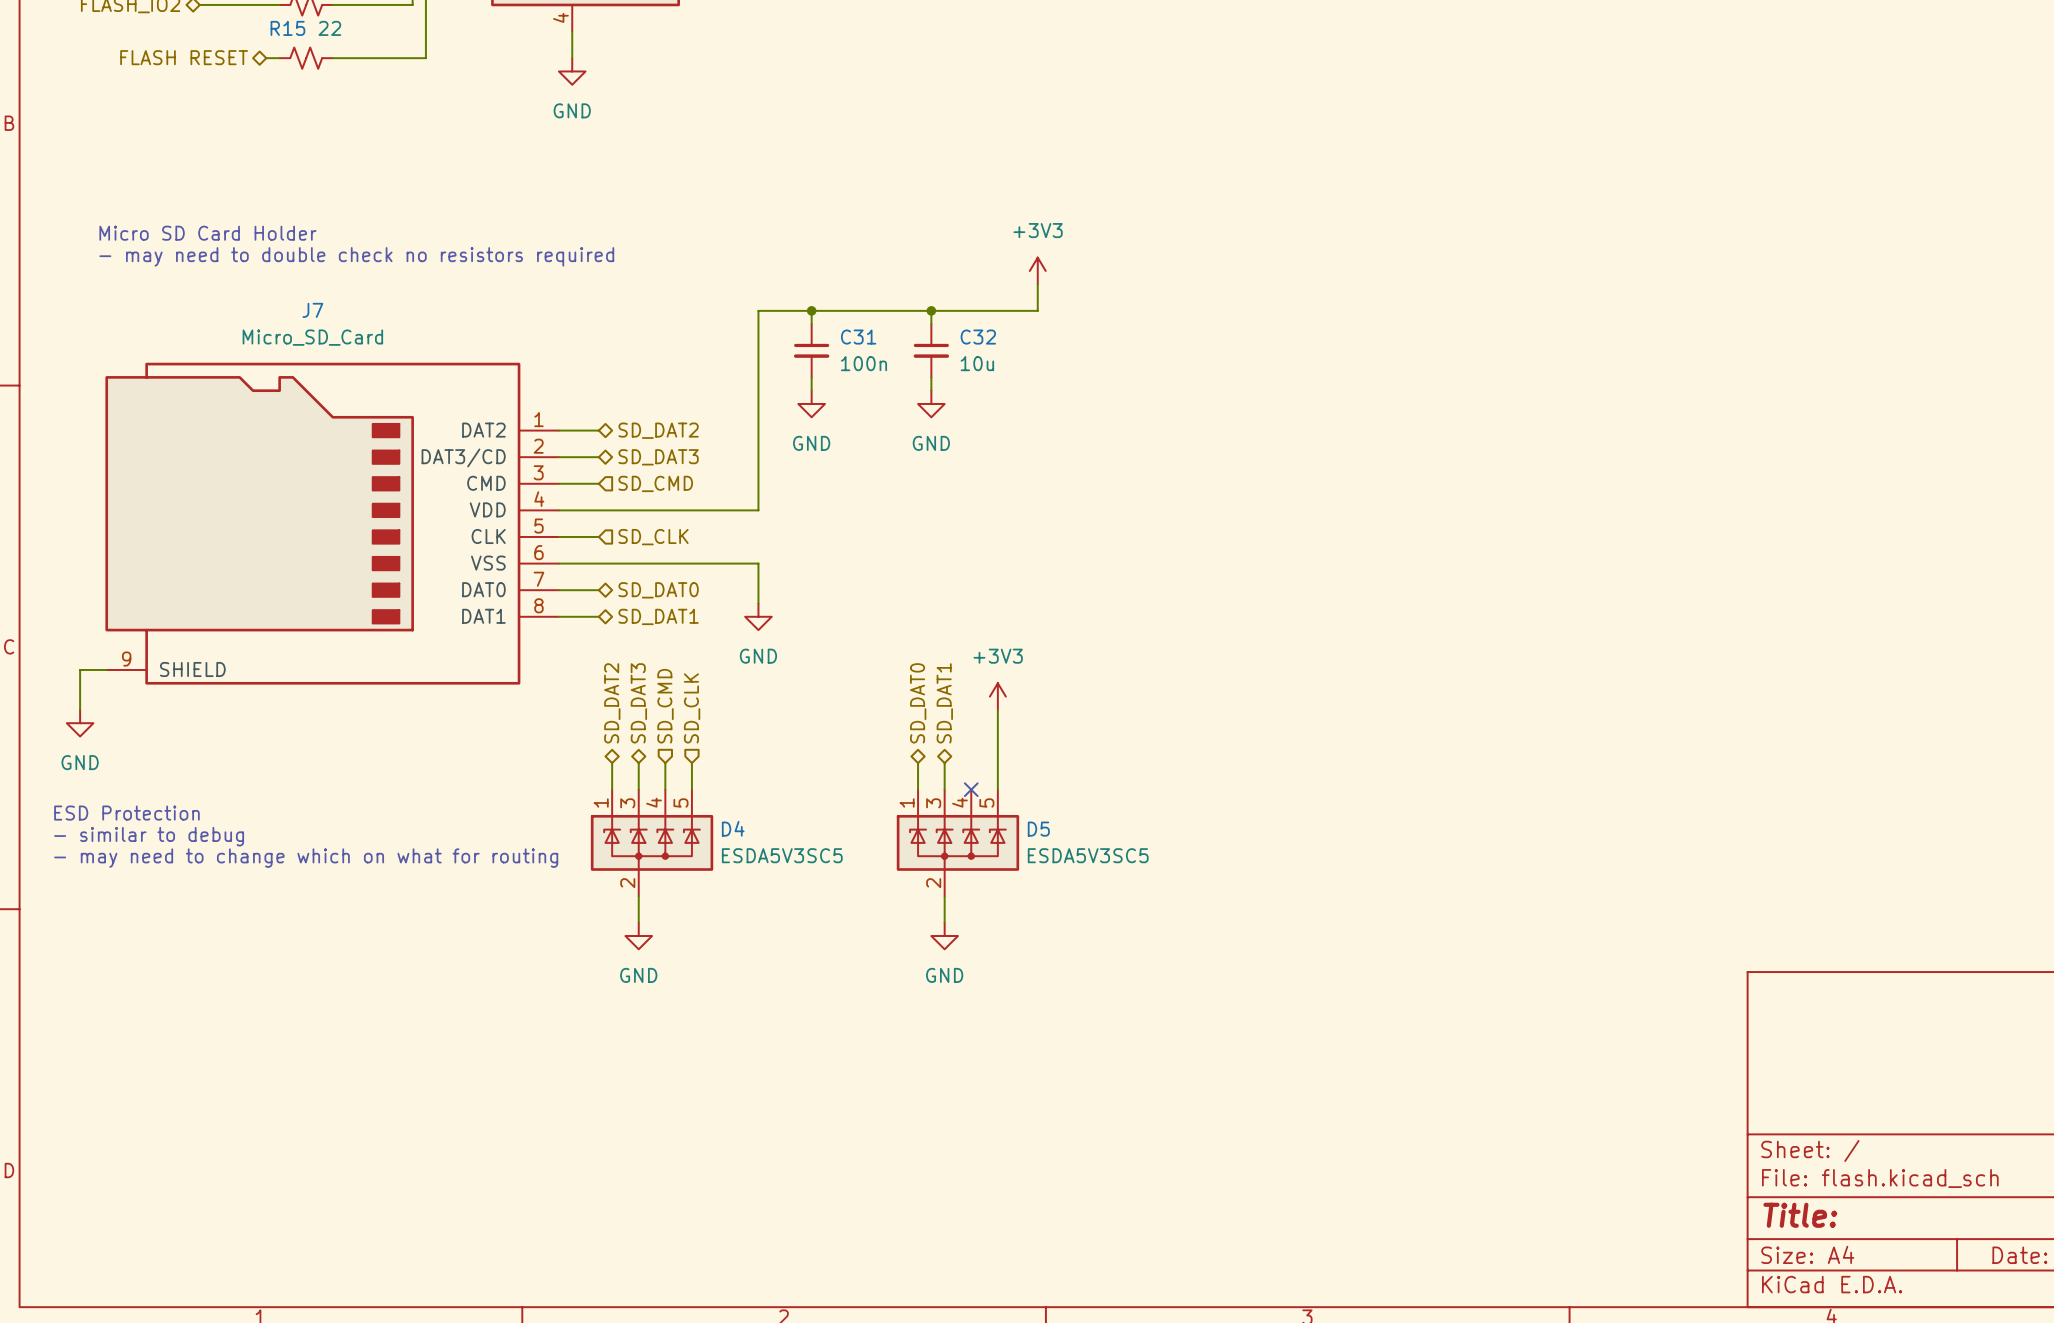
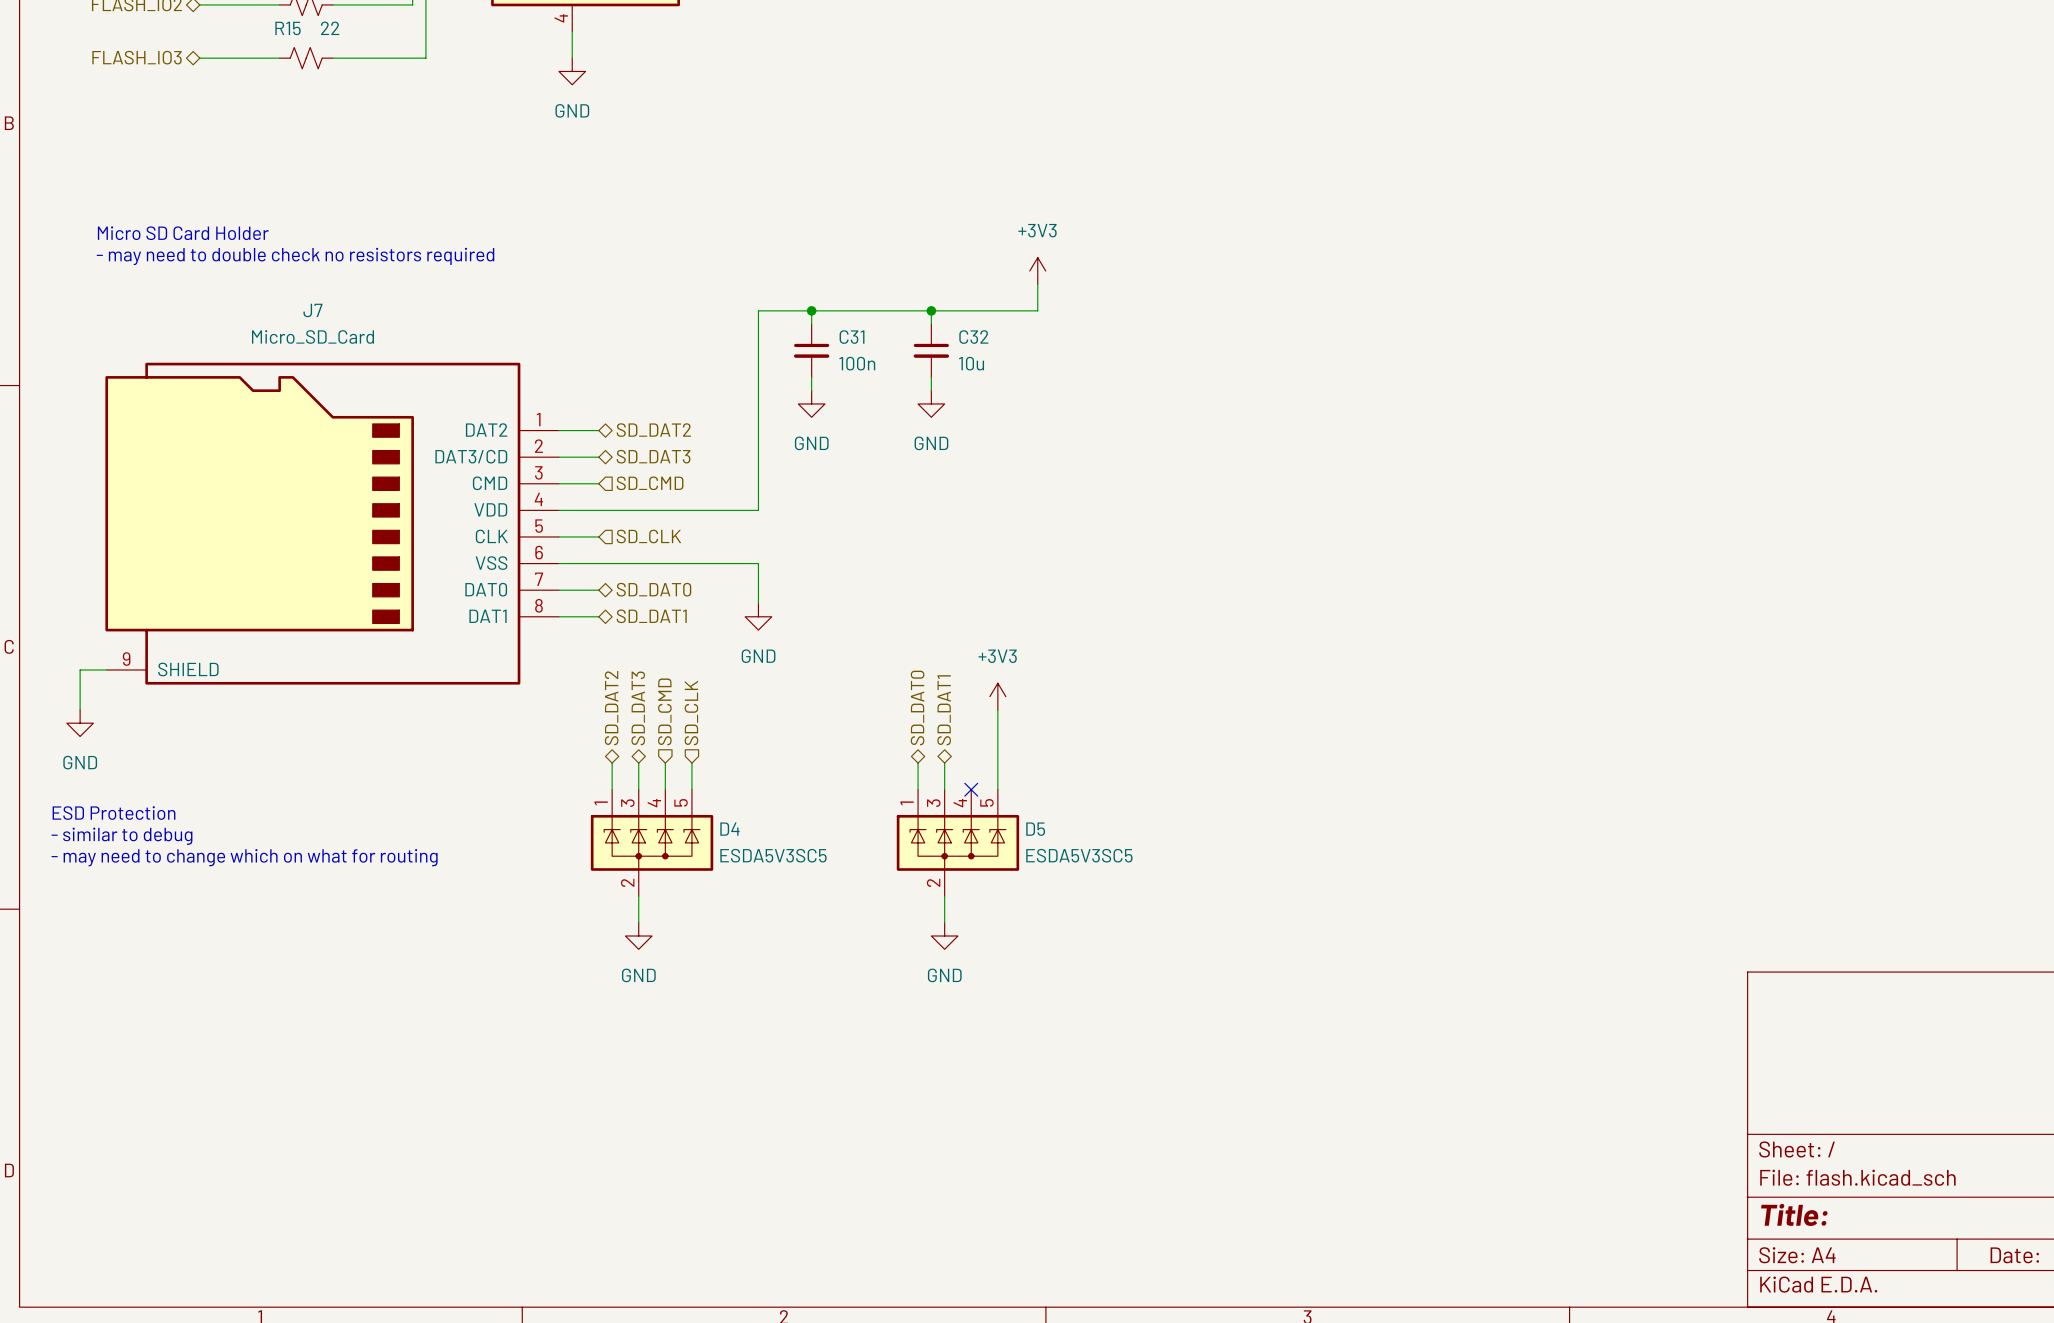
hierarchical label: FLASH RESET (184, 57) -> none
hierarchical label: none -> FLASH_IO3 (137, 57)
wire: none -> (199, 58) (266, 58)

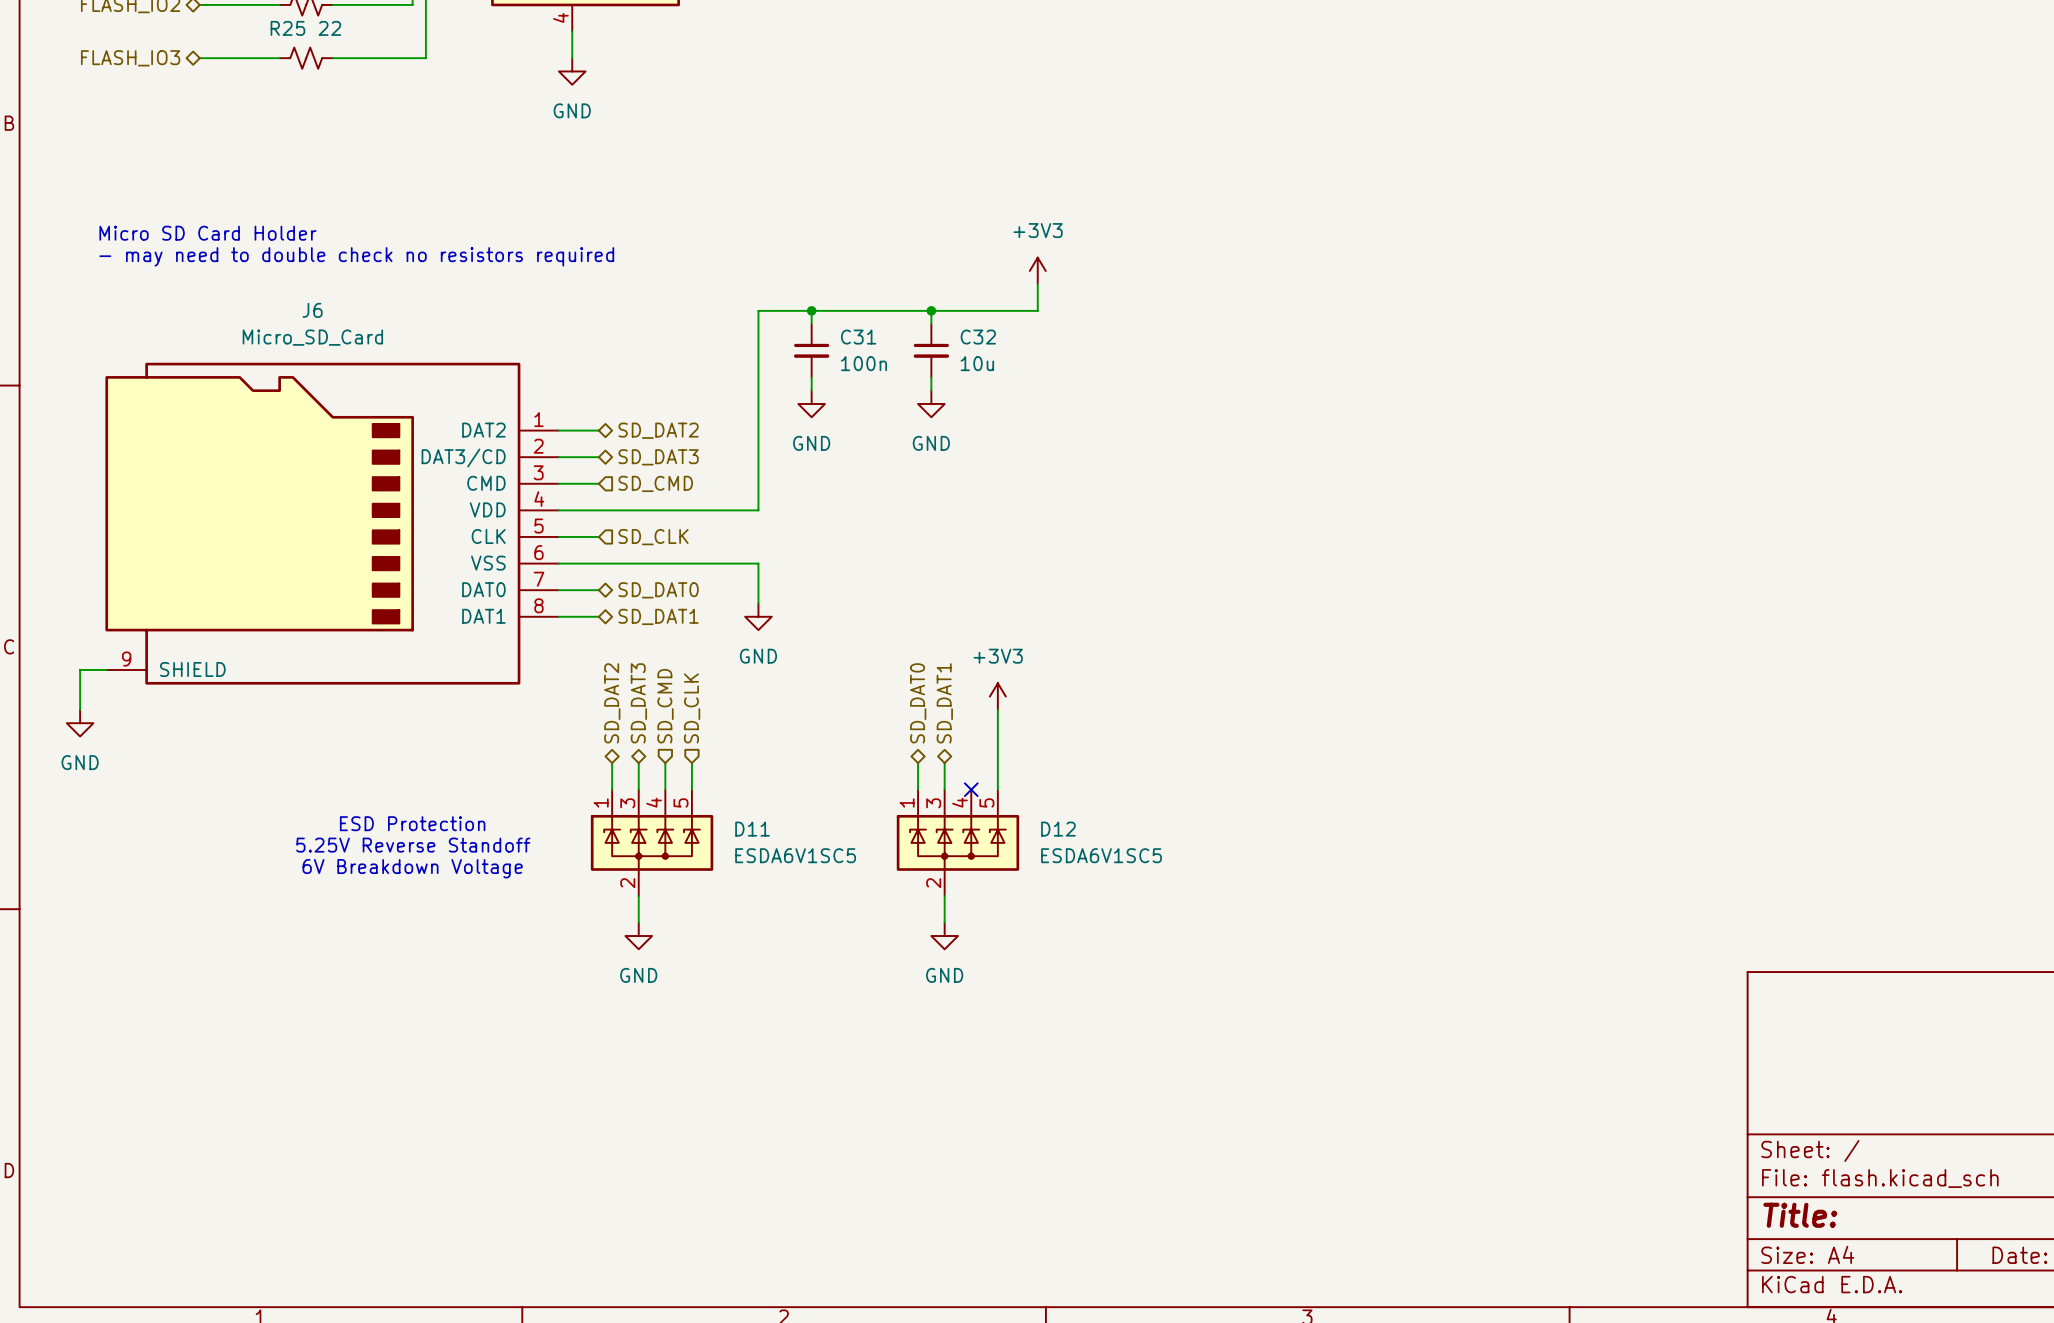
R15 name: R15 (288, 28) -> R25 (287, 28)
J7 name: J7 (312, 310) -> J6 (312, 310)
text: ESD Protection (114, 813) -> none
text: none -> ESD Protection (412, 823)
D4 name: D4 (729, 829) -> D11 (752, 829)
D5 name: D5 (1035, 829) -> D12 (1058, 829)
text: - similar to debug (122, 836) -> none
text: none -> 5.25V Reverse Standoff (413, 845)
D4 value: ESDA5V3SC5 (773, 855) -> ESDA6V1SC5 (795, 855)
D5 value: ESDA5V3SC5 (1079, 855) -> ESDA6V1SC5 (1101, 855)
text: - may need to change which on what for routing (244, 857) -> none
text: none -> 6V Breakdown Voltage (412, 868)

